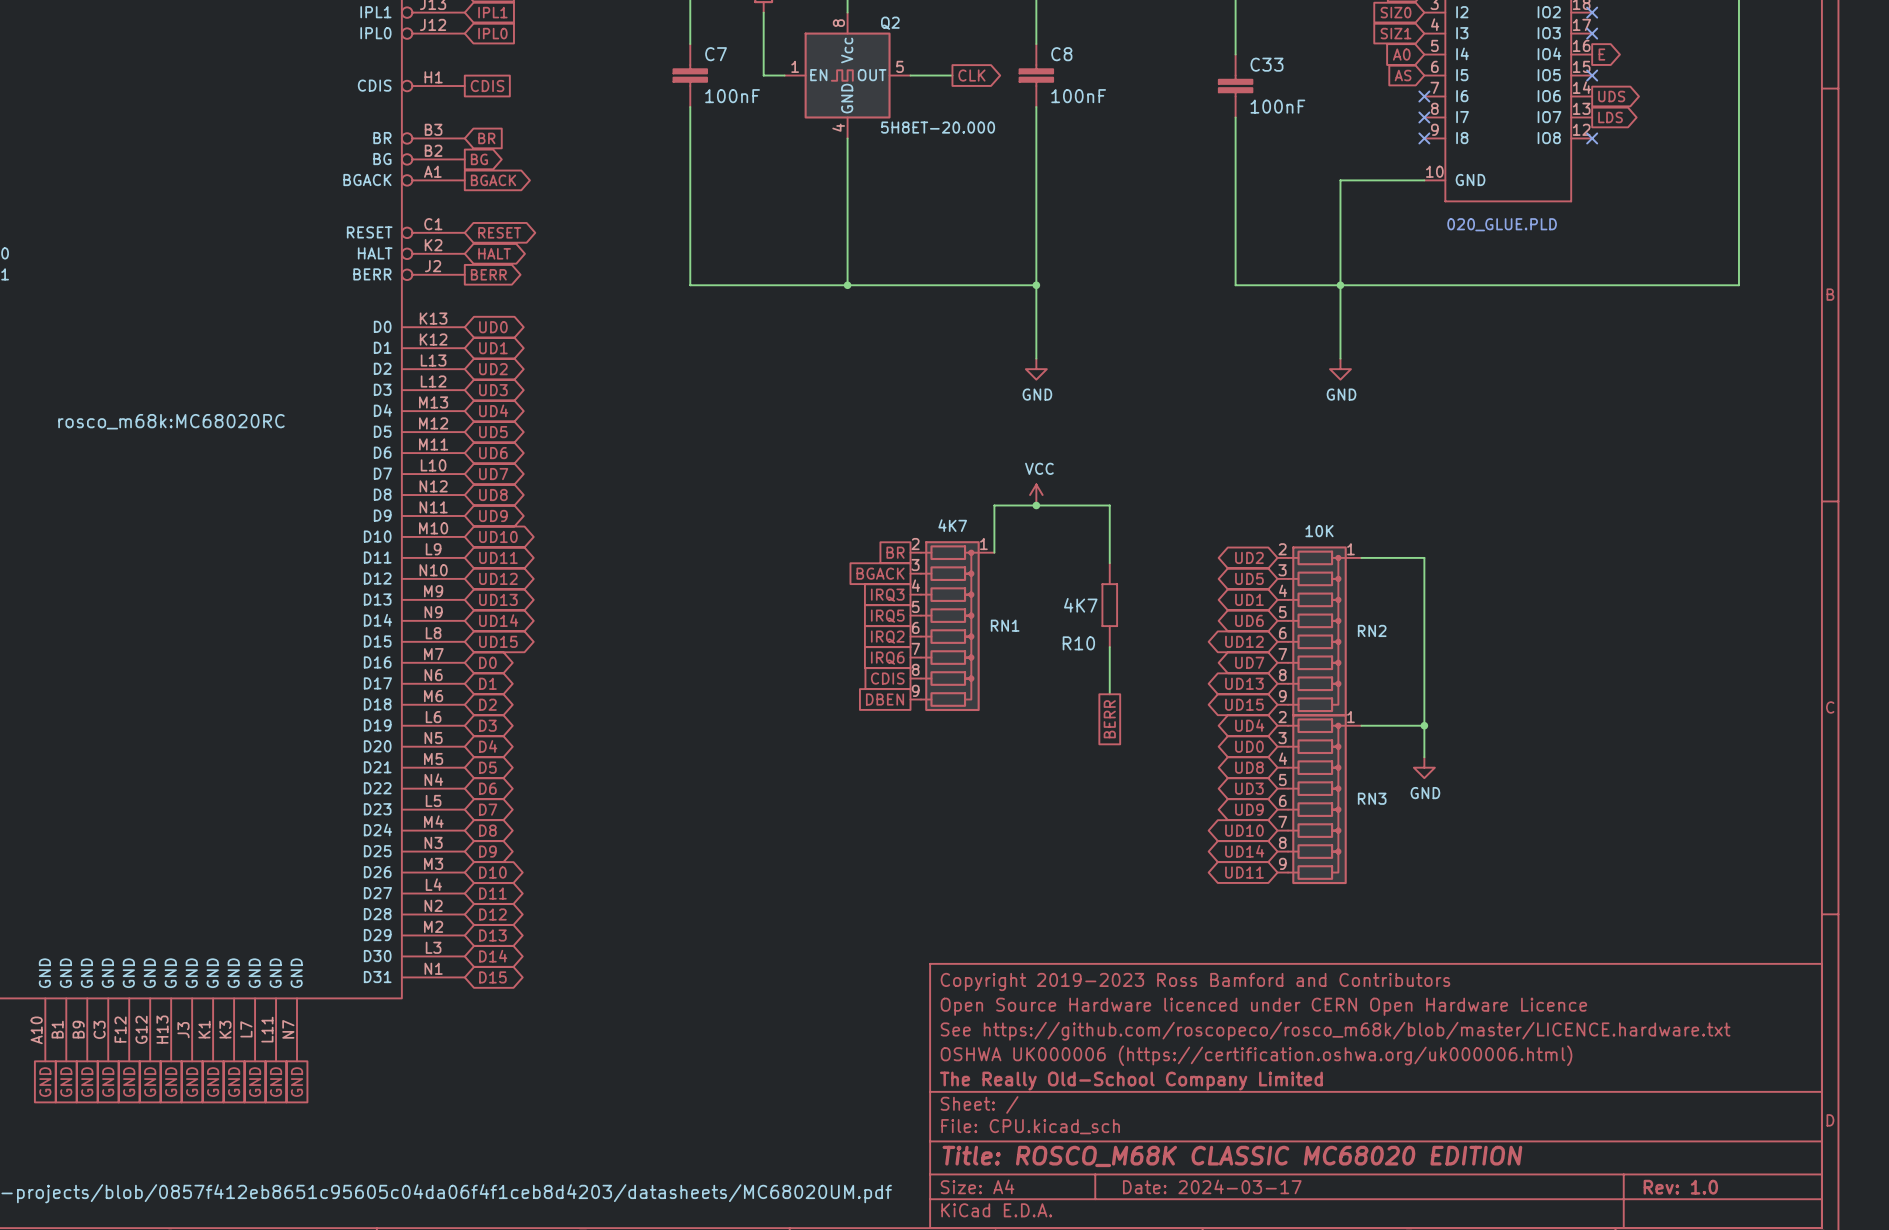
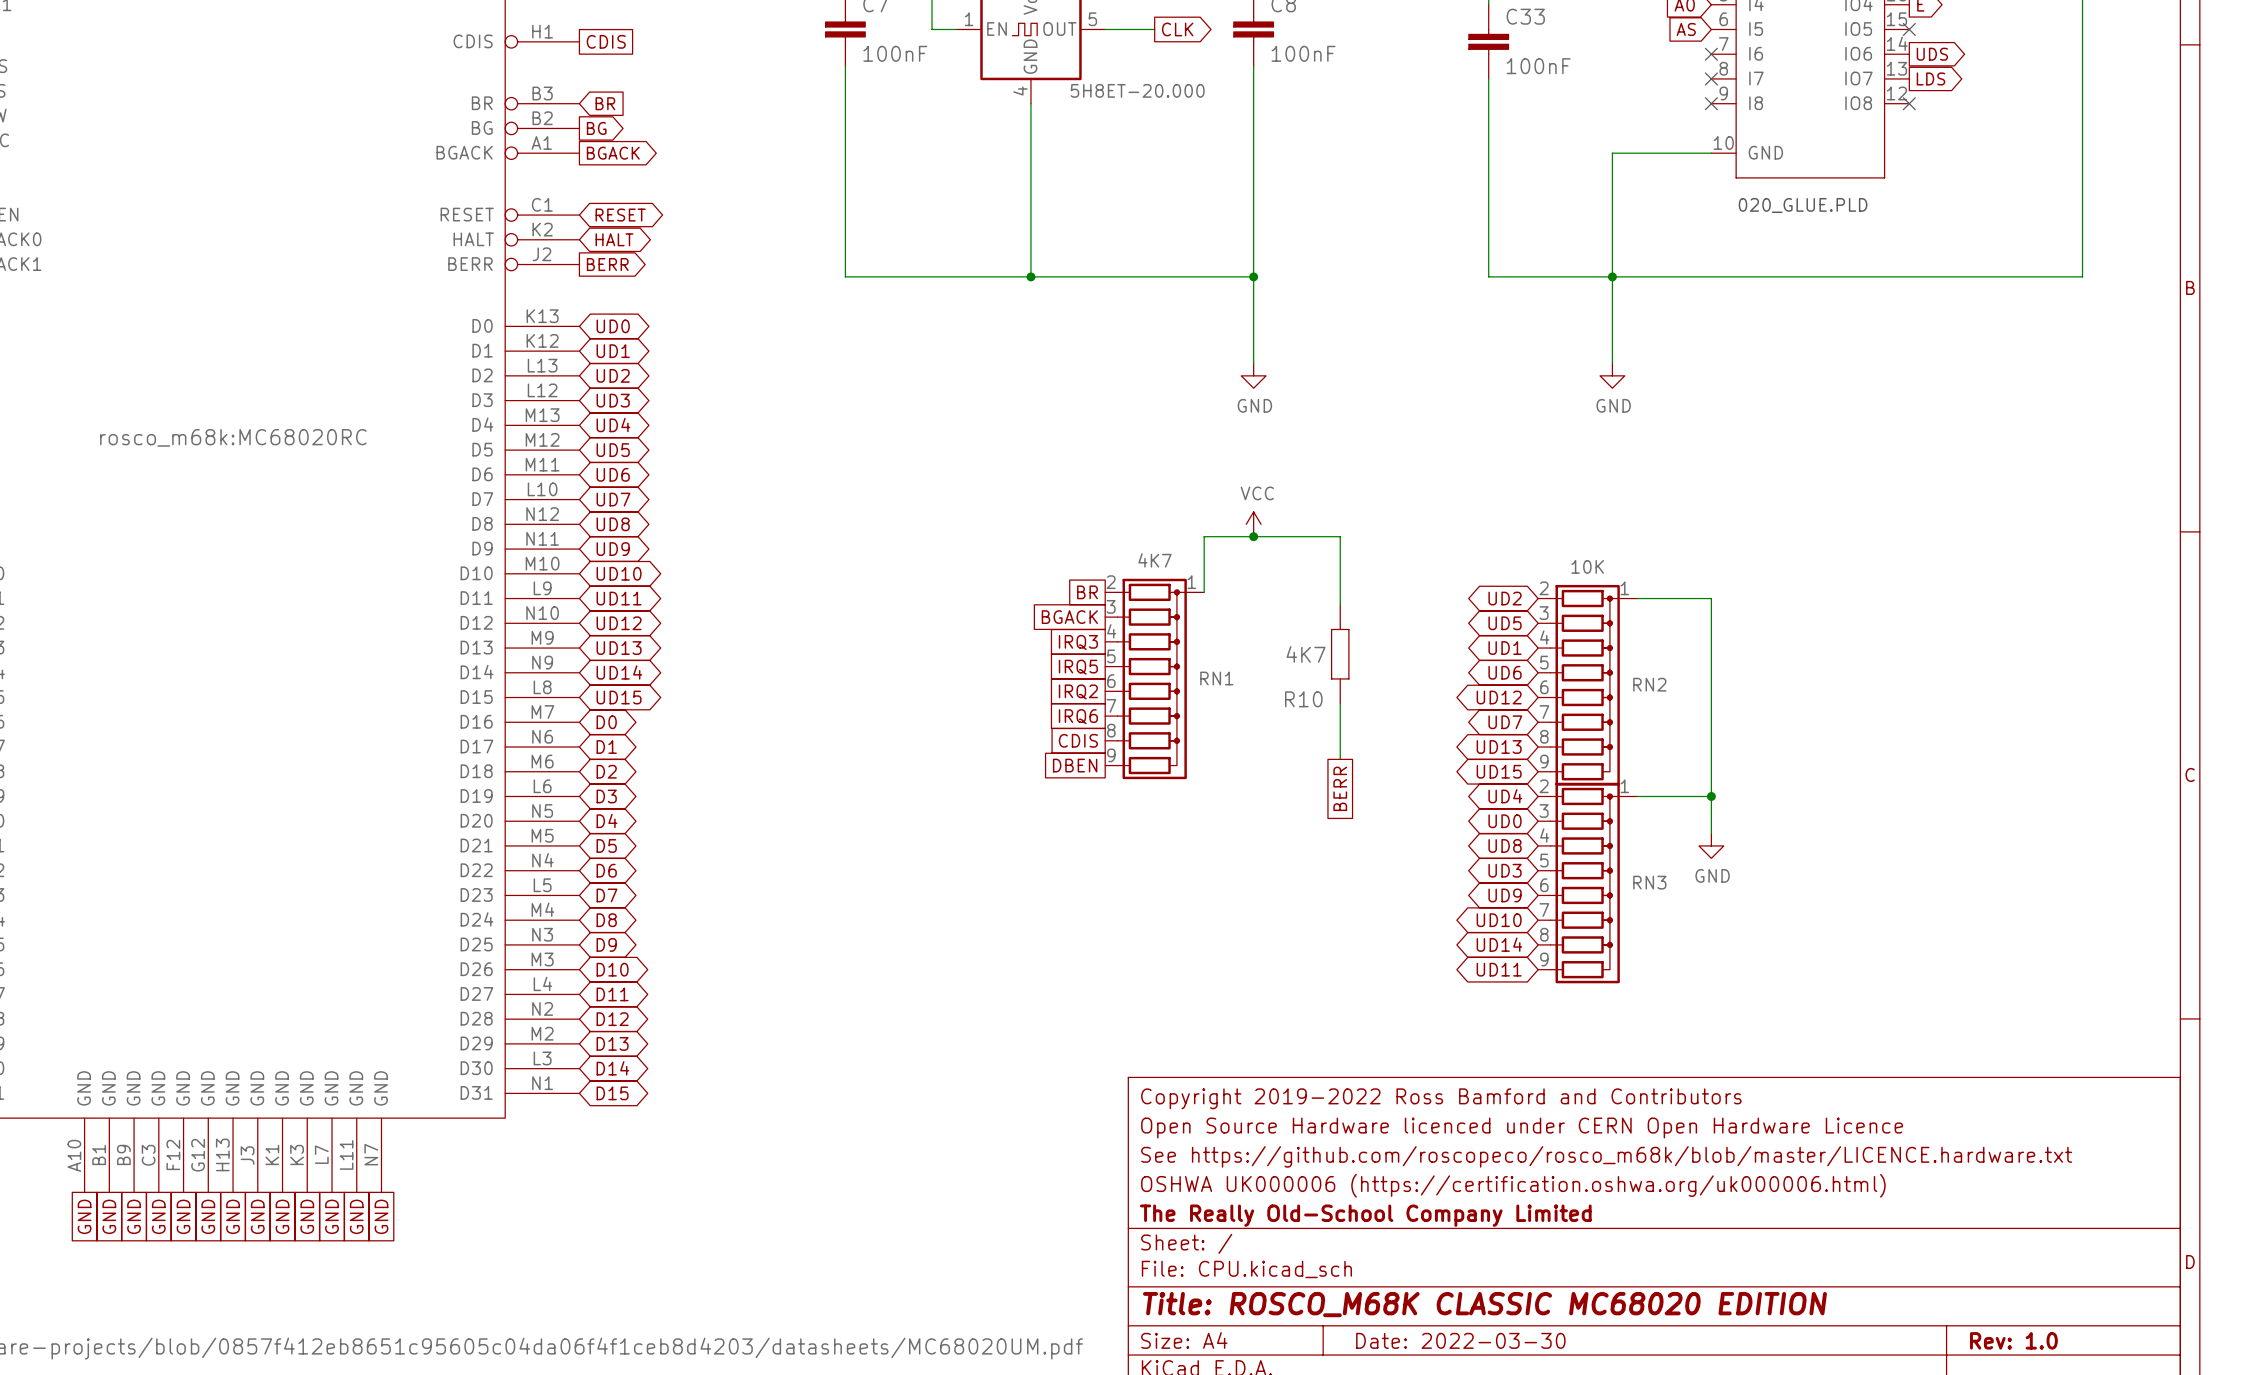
title block: Copyright 2019-2023 Ross Bamford and Contributors (1195, 981) -> Copyright 2019-2022 Ross Bamford and Contributors (1441, 1098)
title block: Date: 2024-03-17 (1212, 1186) -> Date: 2022-03-30 (1460, 1340)

